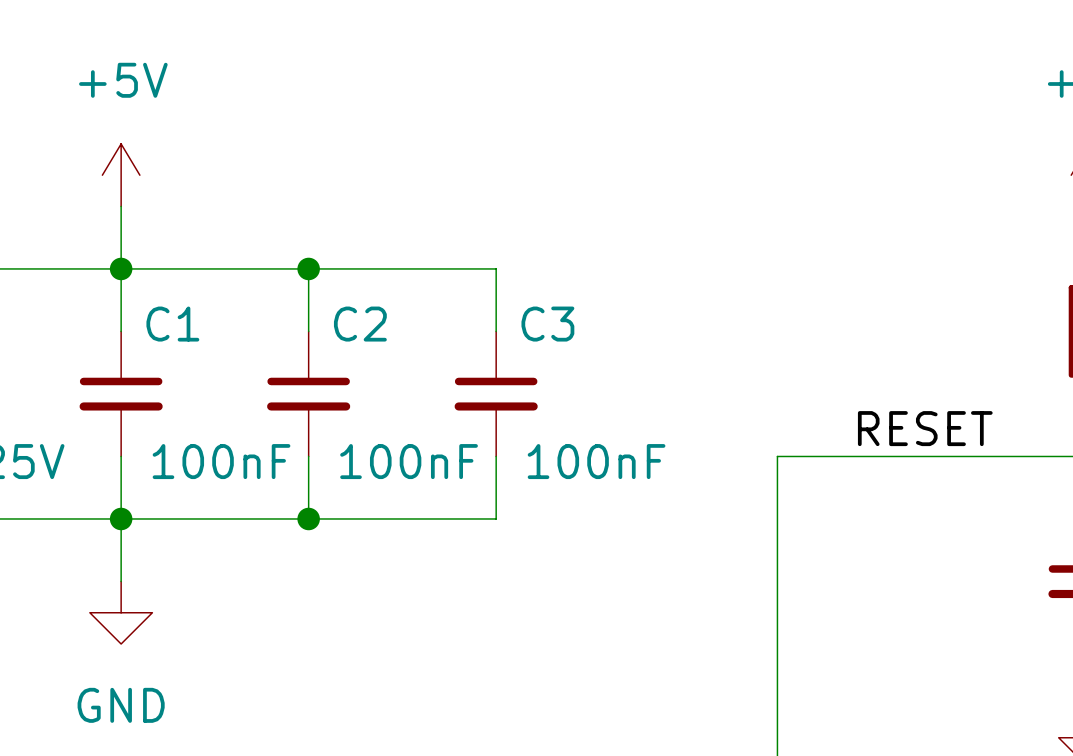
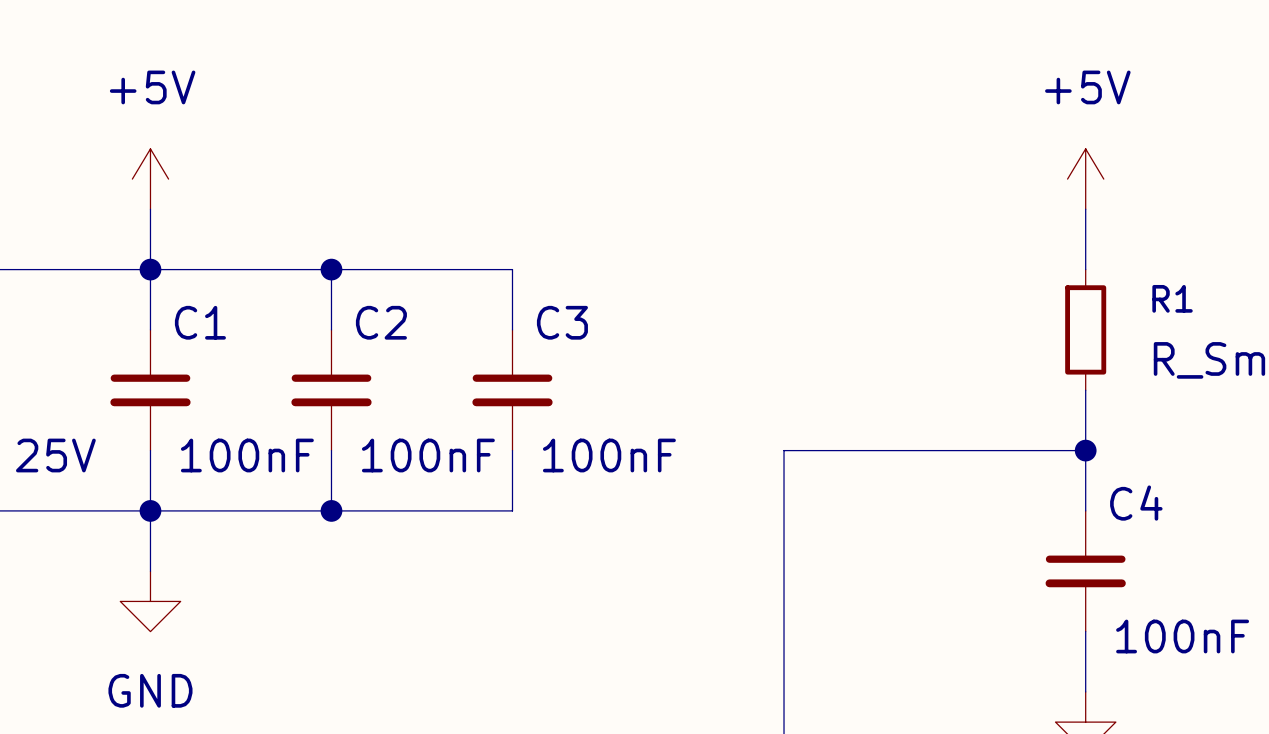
label: RESET (925, 428) -> none

